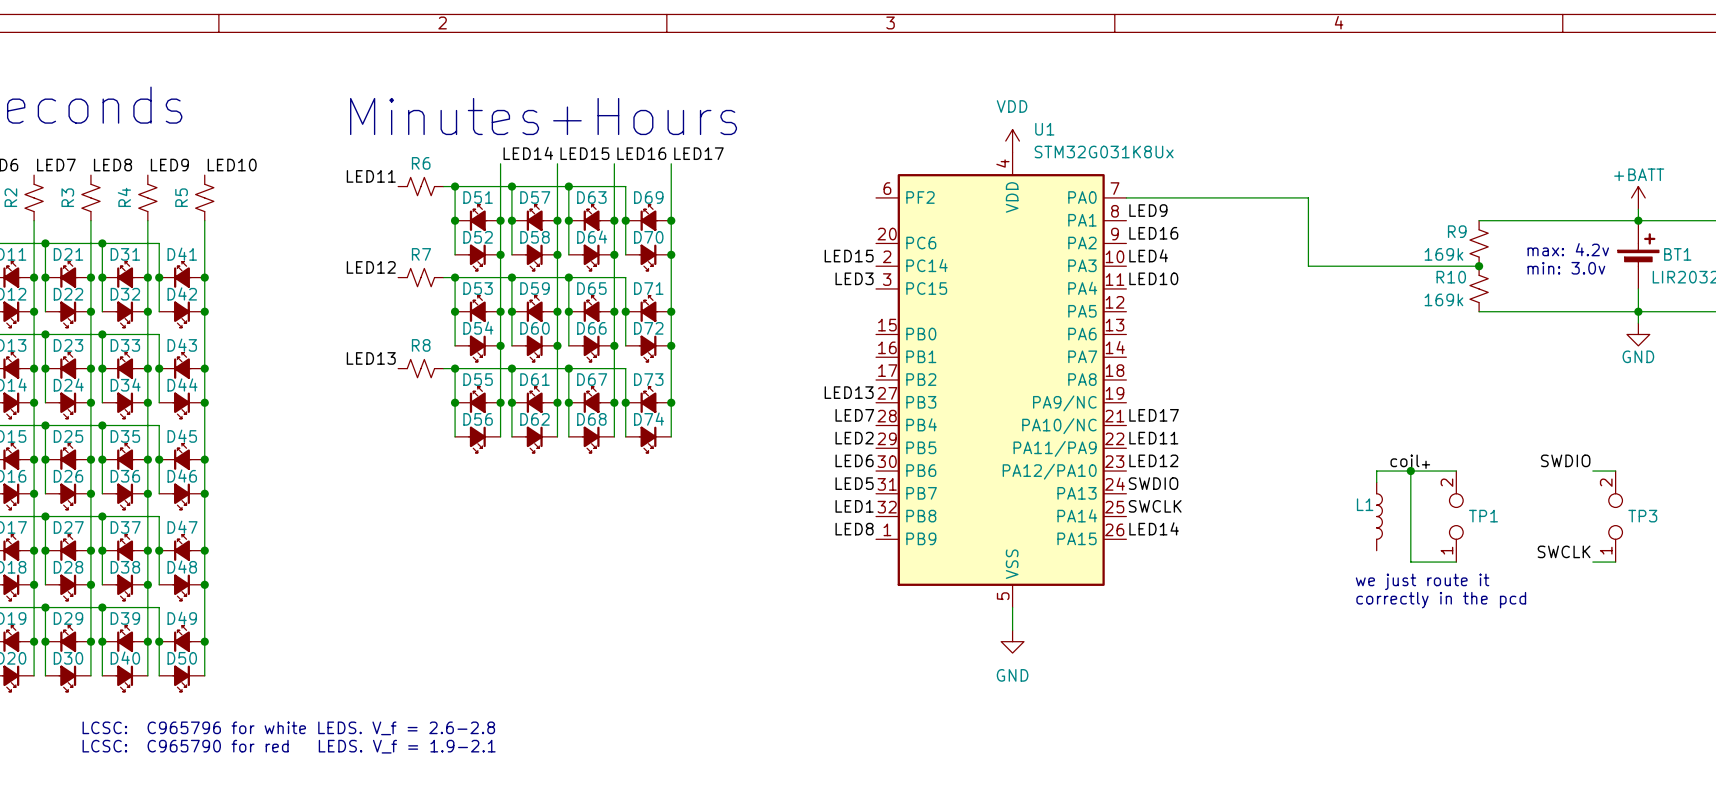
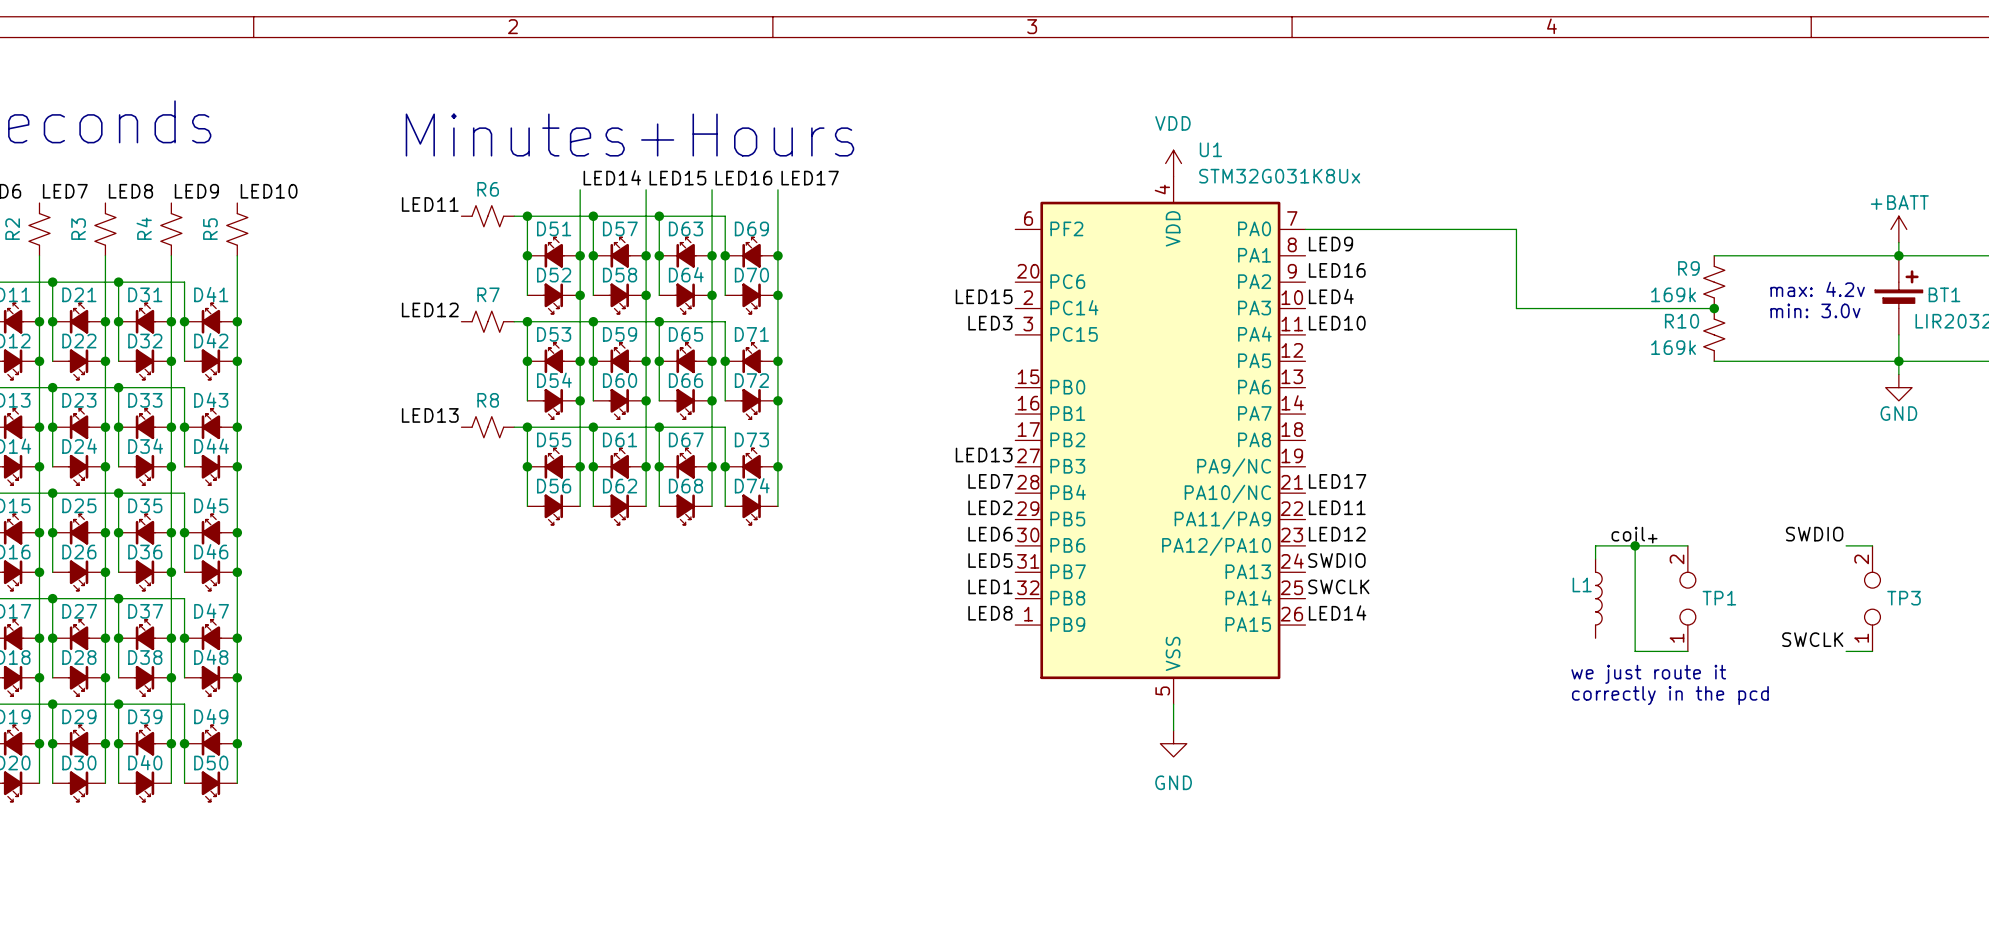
text: LCSC: C965796 for white LEDS. V_f = 2.6-2.8 (288, 728) -> none
text: LCSC: C965790 for red LEDS. V_f = 1.9-2.1 (289, 746) -> none

